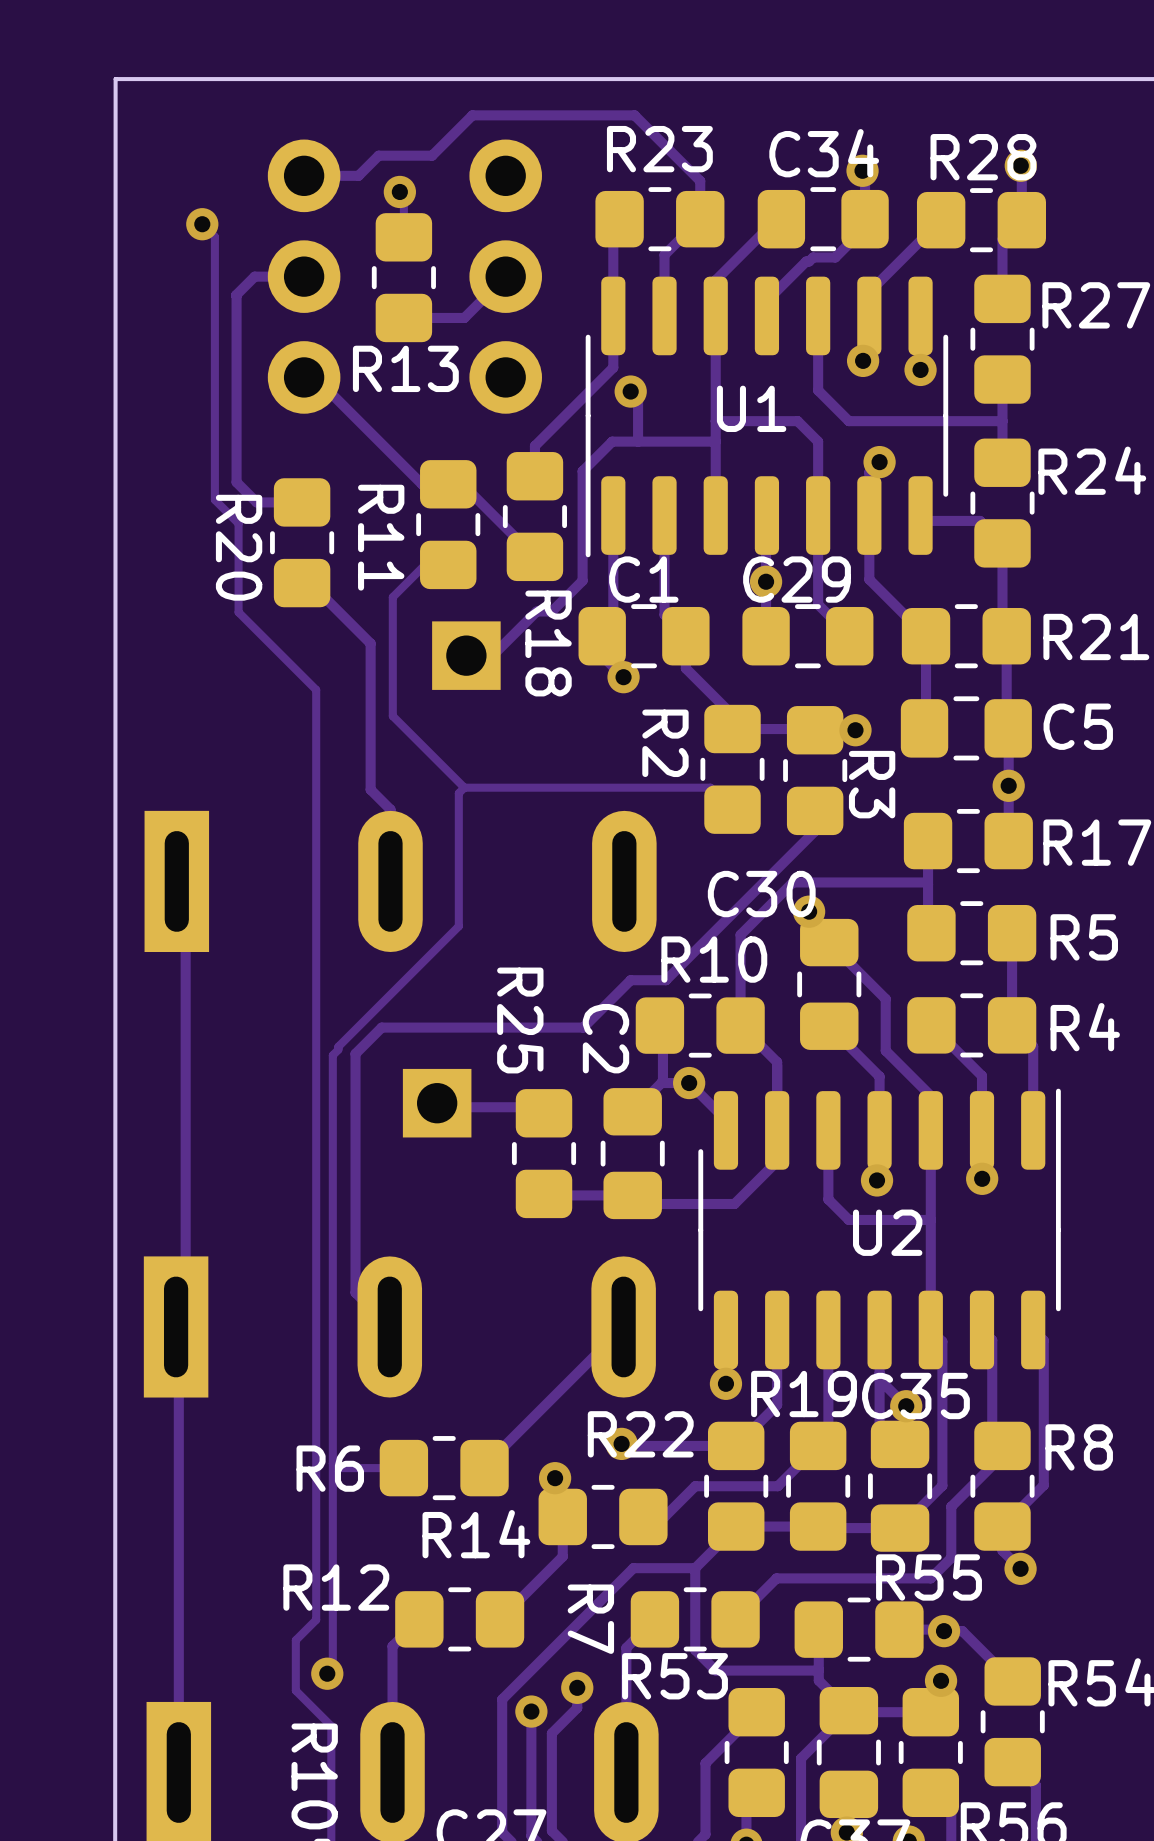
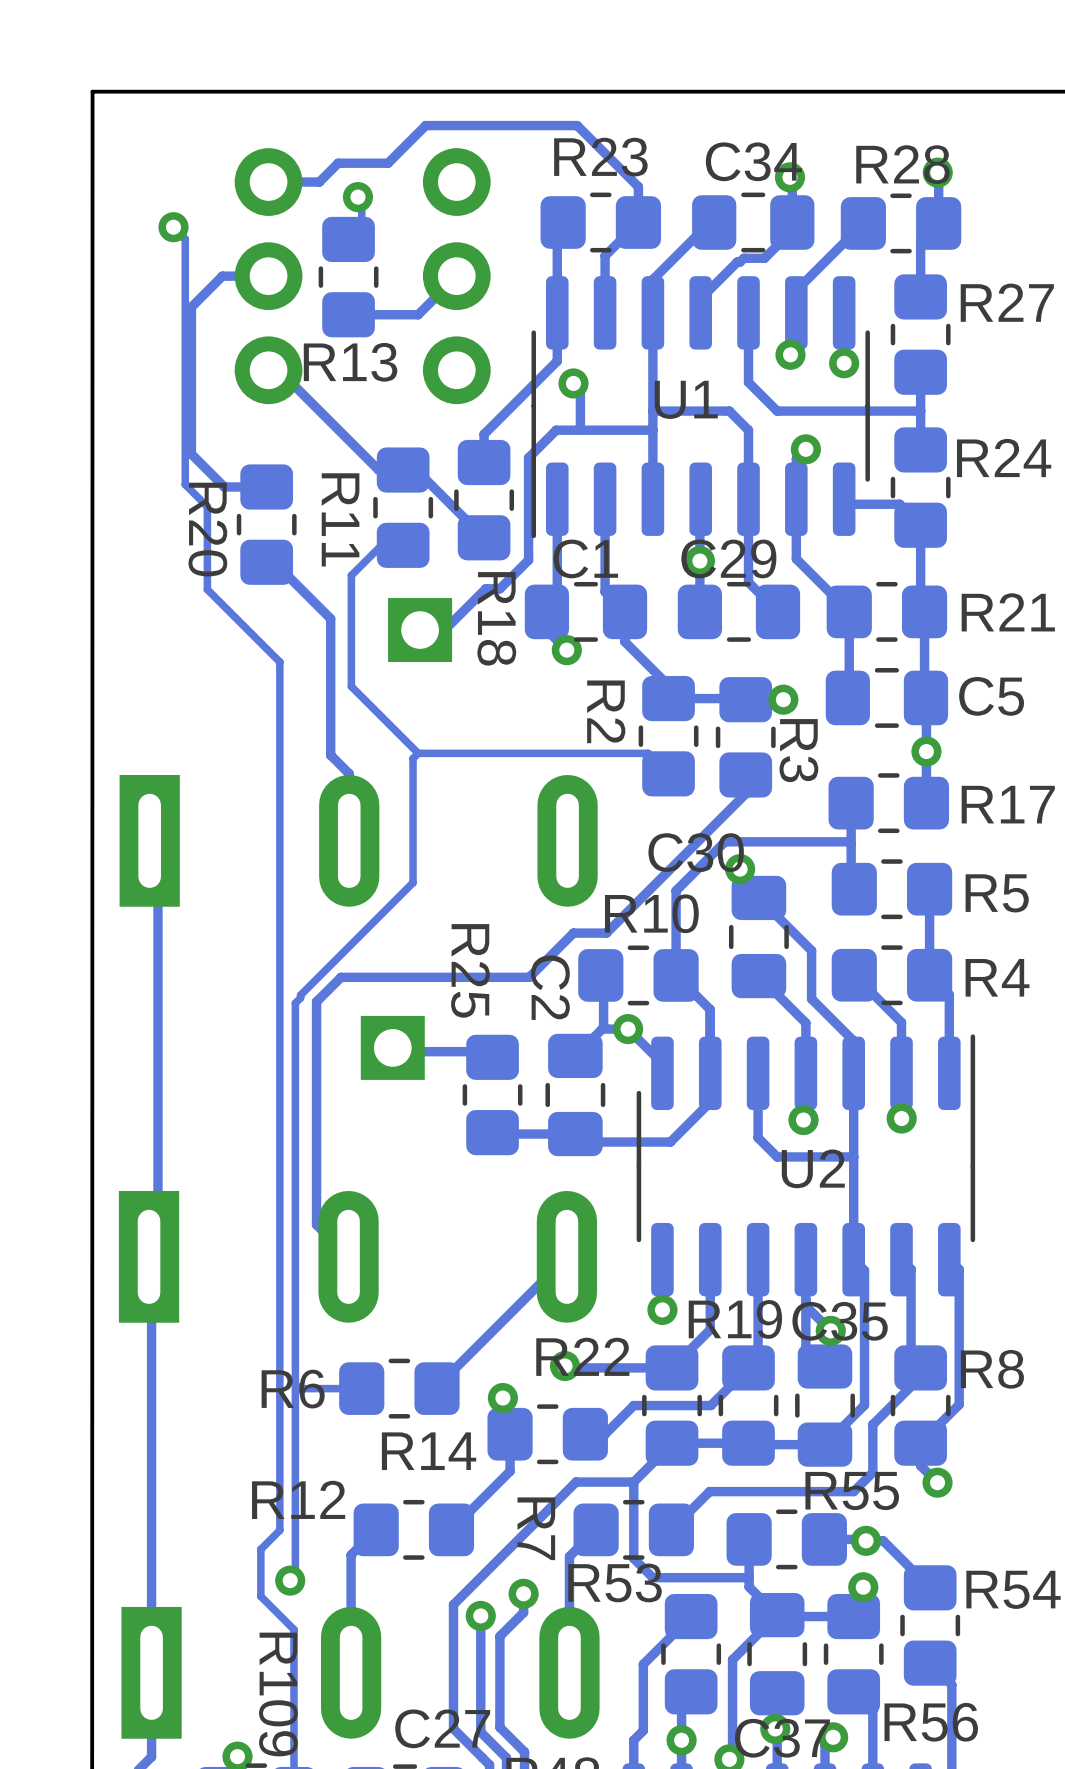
R13 position: (403, 277) -> (348, 277)
track: (236, 295) (236, 482) -> (205, 293) (191, 307) (191, 454) (205, 468)

